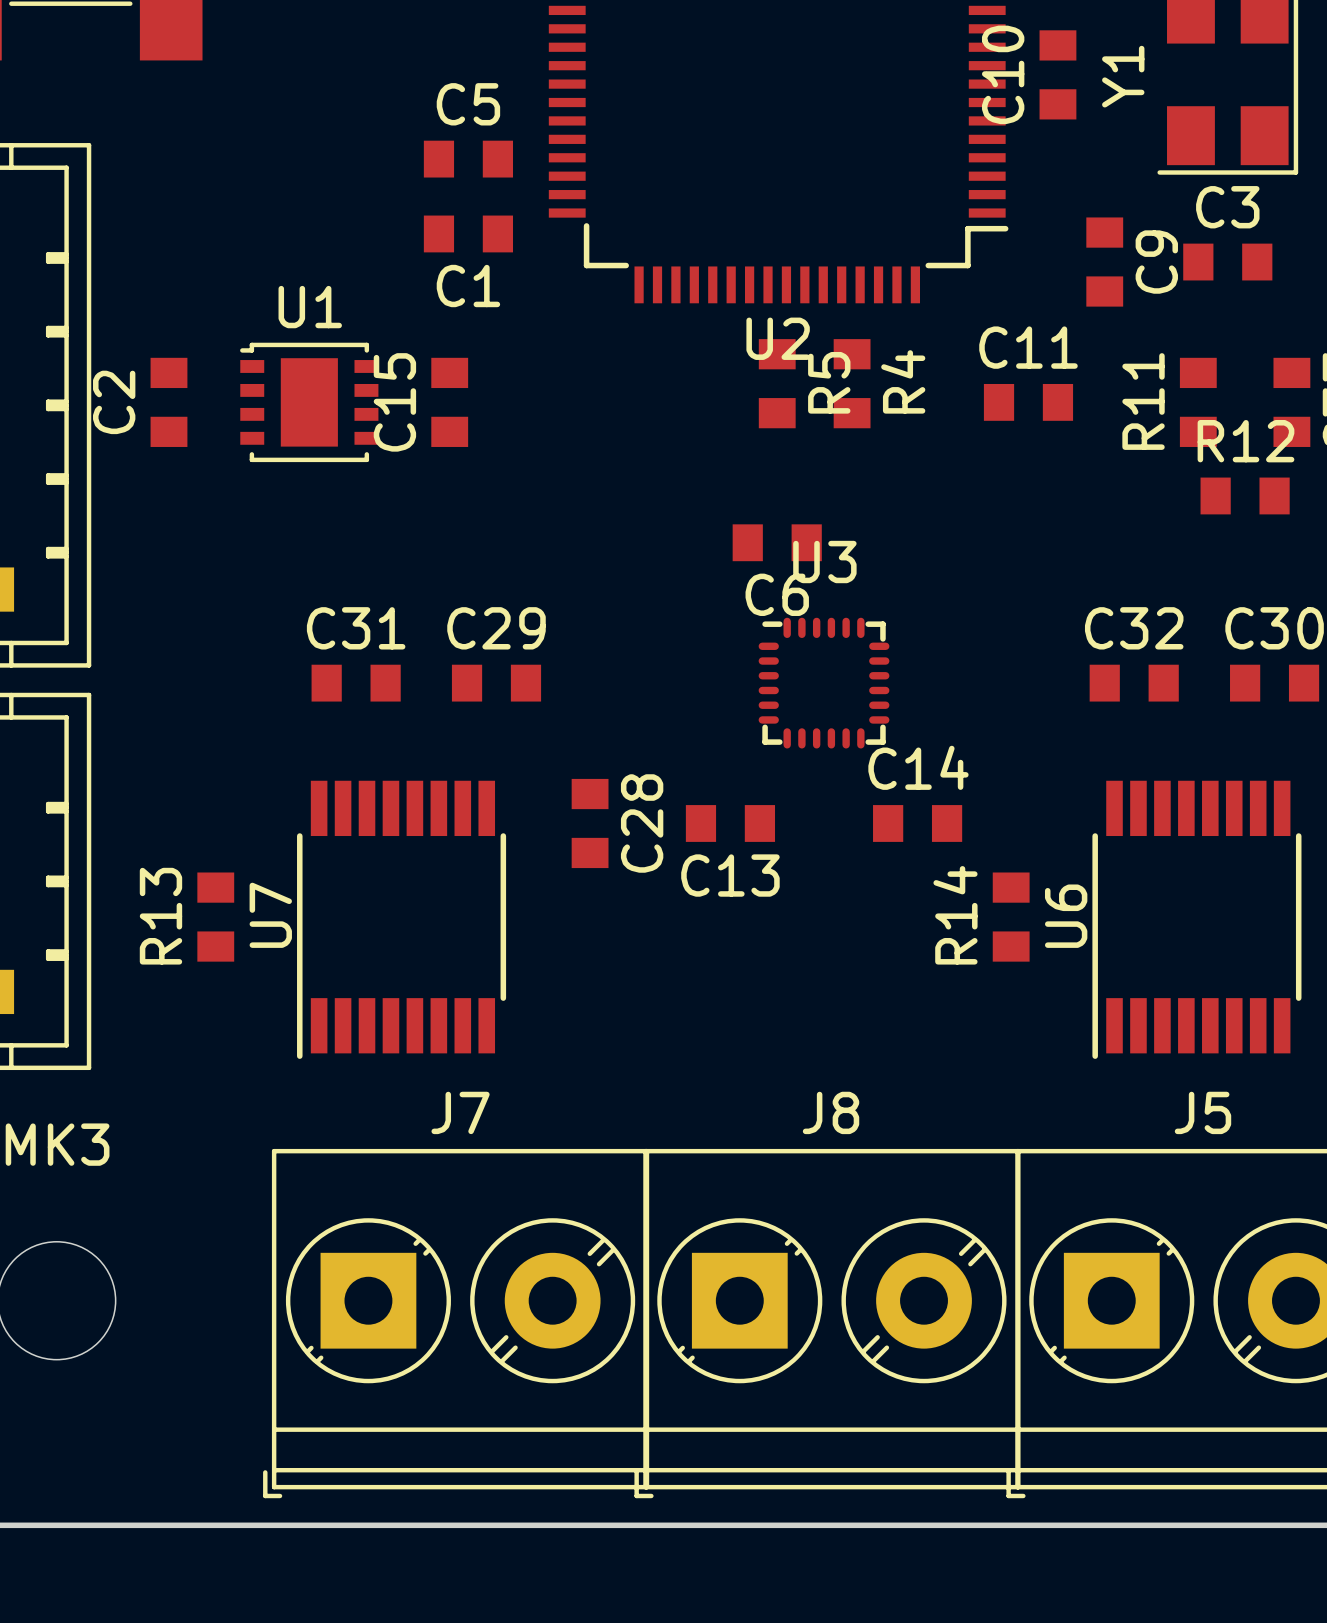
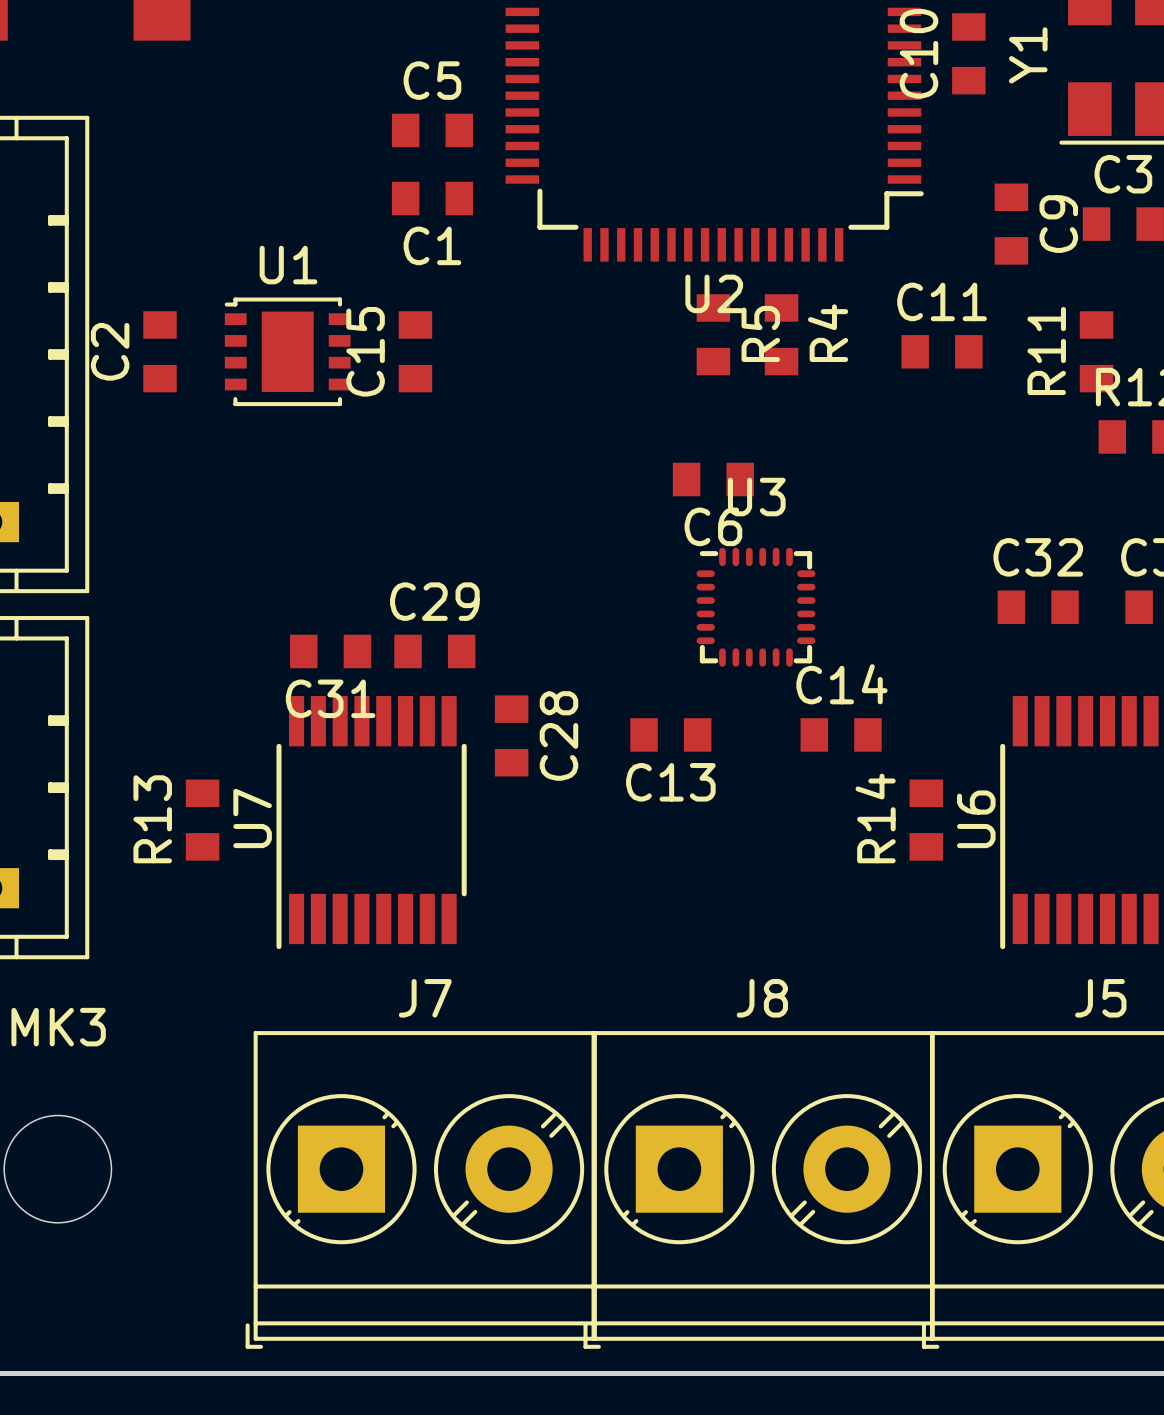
C31 name position: C31 (356, 628) -> C31 (330, 698)
C31 position: (356, 683) -> (330, 651)
C29 position: (496, 683) -> (434, 651)
C28 position: (590, 823) -> (511, 735)

